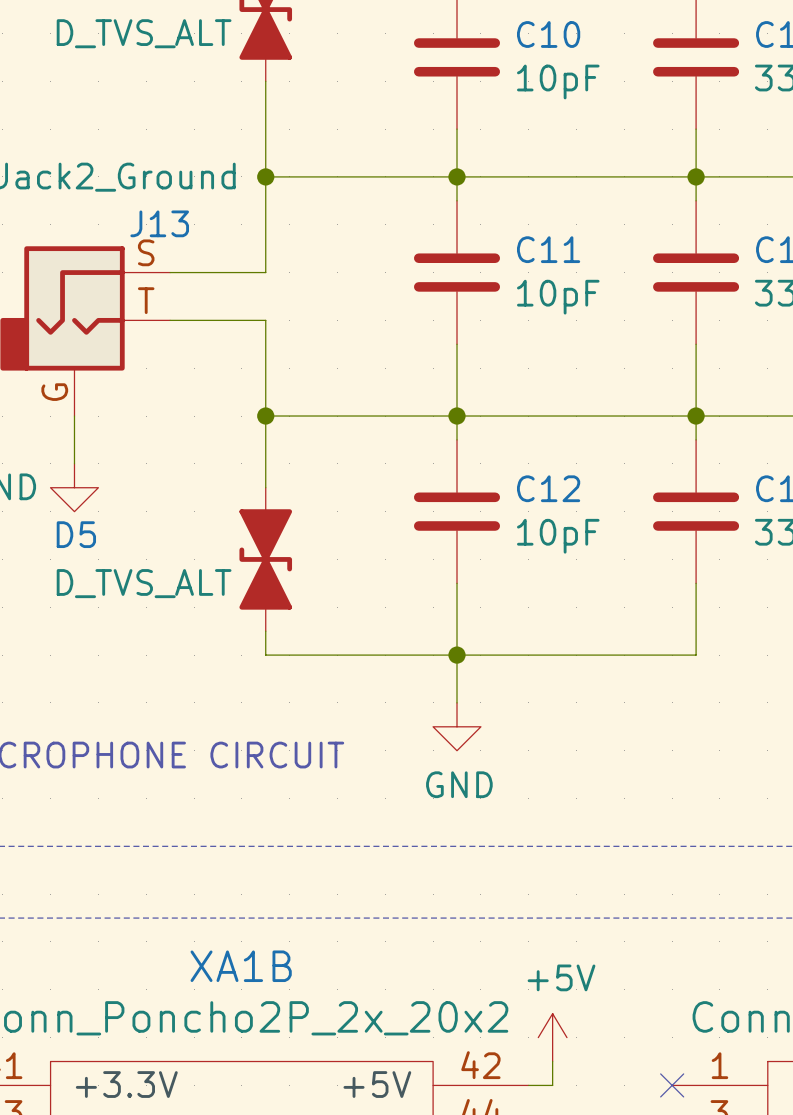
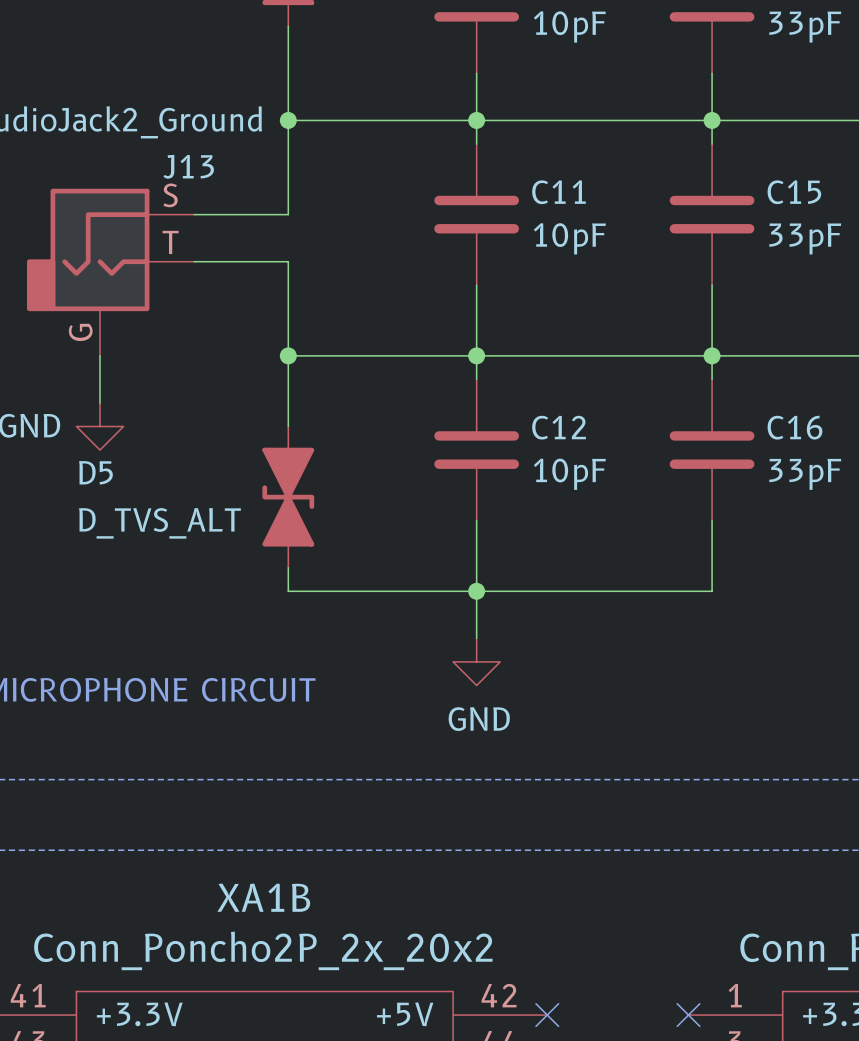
power symbol: +5V (552, 1037) -> none
wire: (552, 1061) (552, 1085) (528, 1085) -> none
no-connect mark: none -> (547, 1015)

